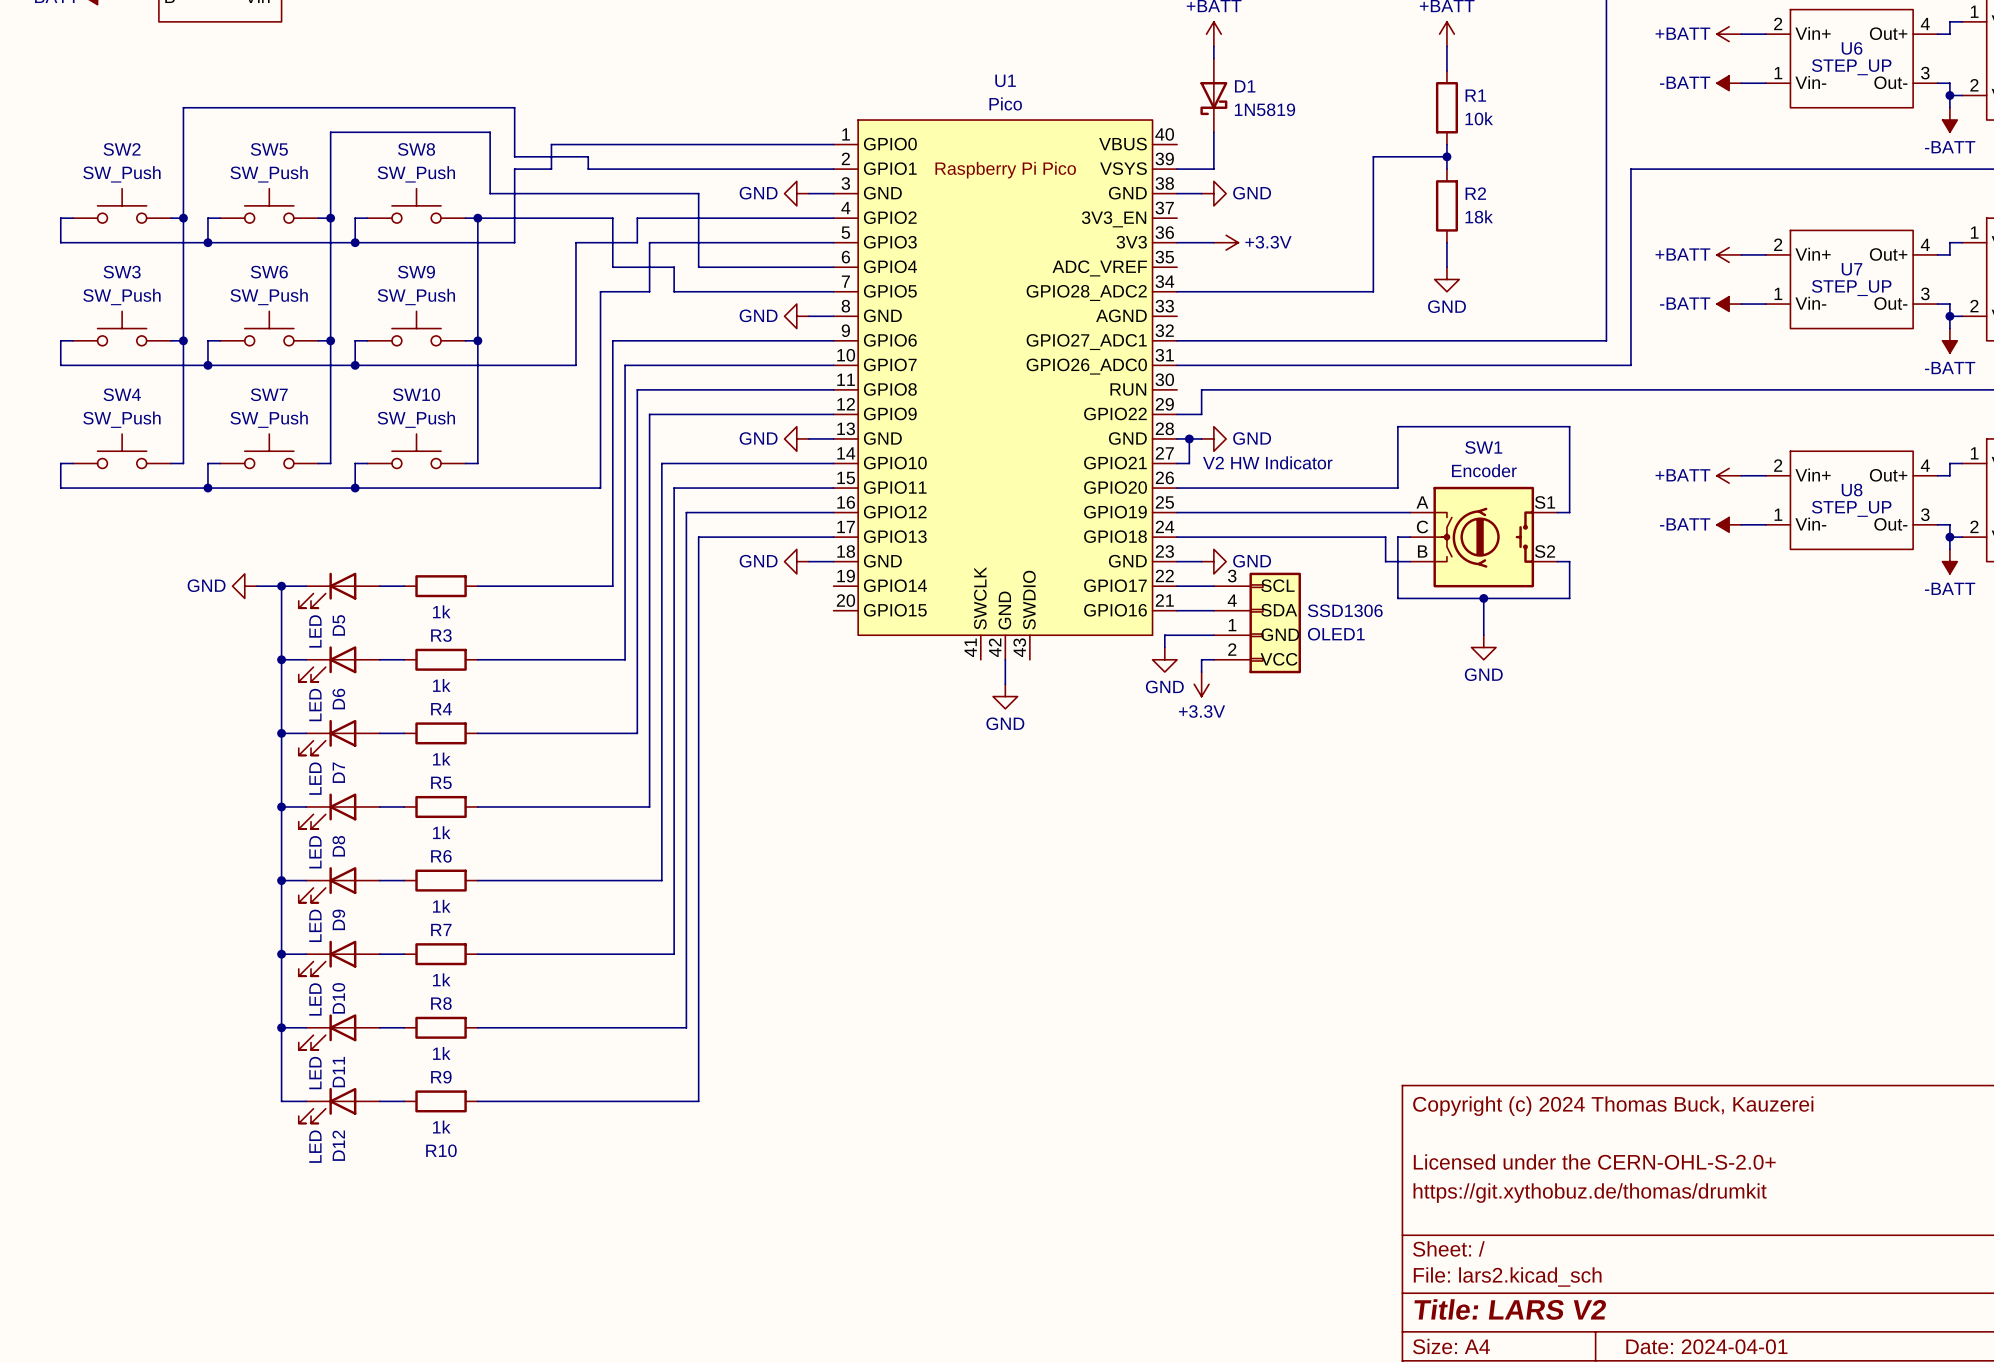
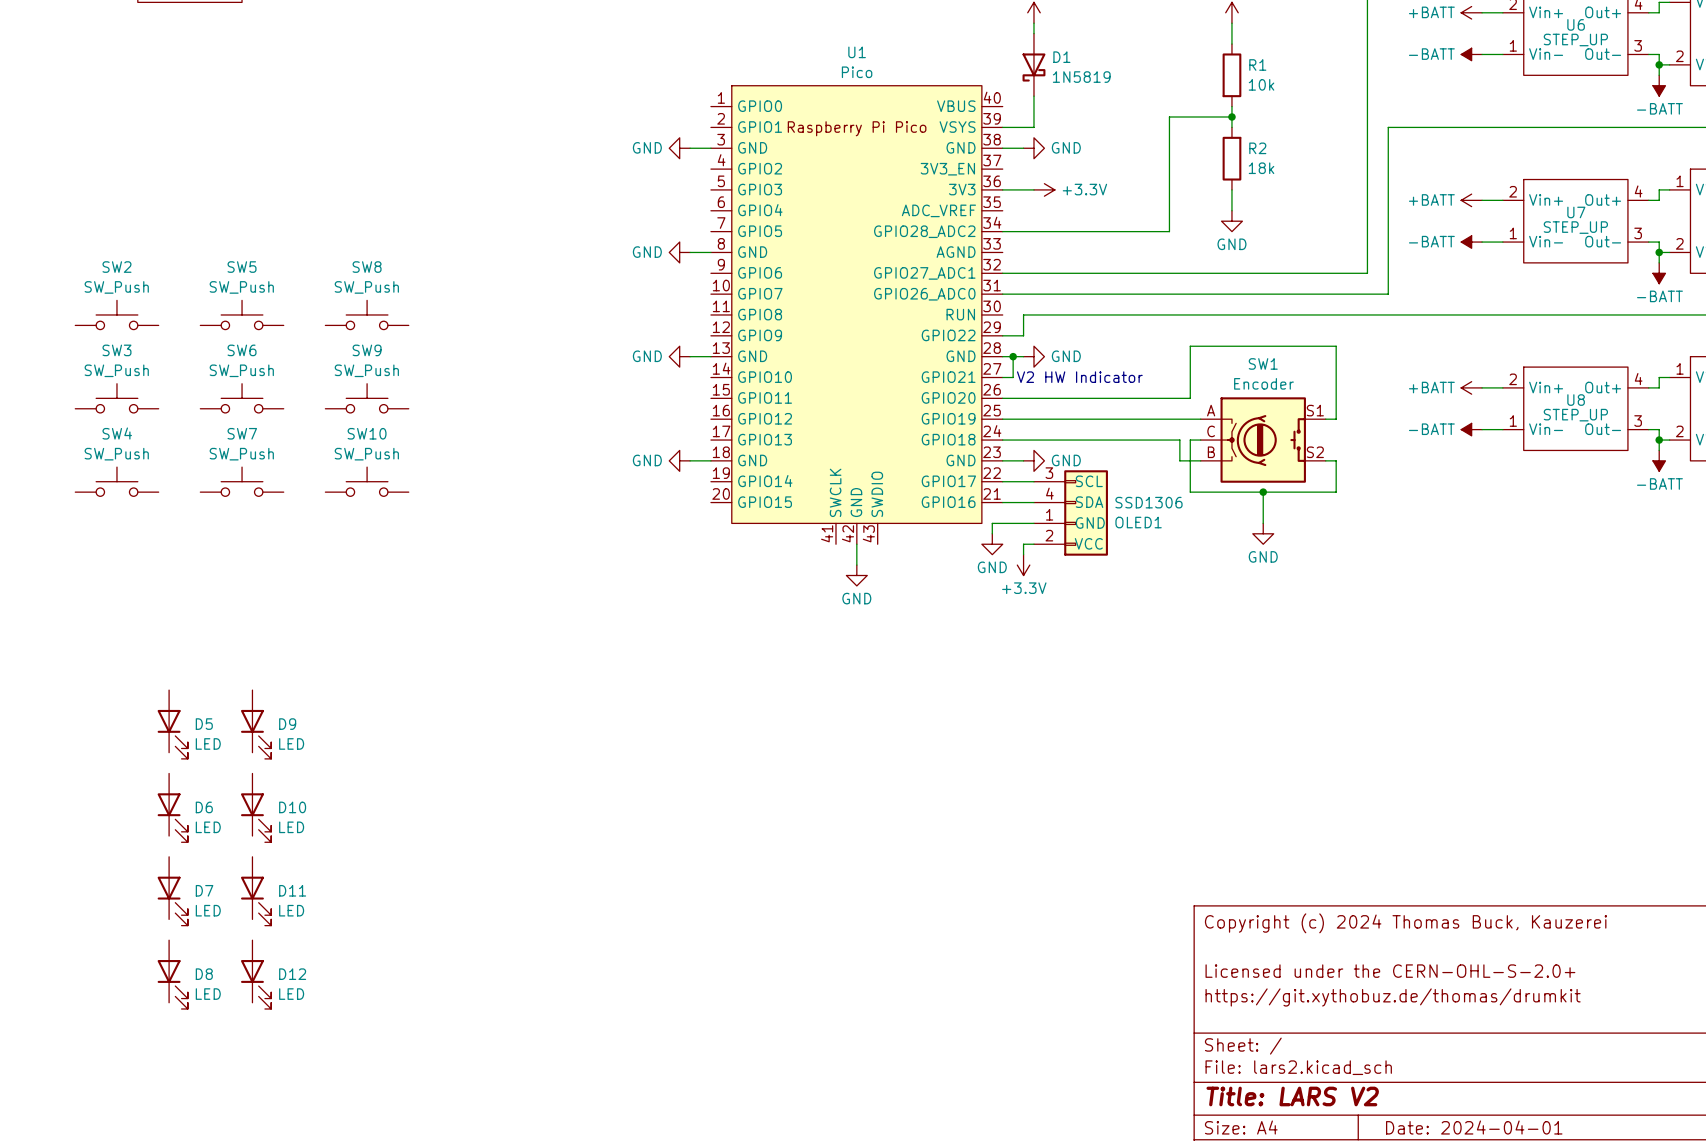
wire: (833, 144) (551, 144) (551, 169) (514, 169) (514, 242) (60, 242) (60, 218) (73, 218) -> none
wire: (833, 169) (588, 169) (588, 156) (514, 156) (514, 107) (183, 107) (183, 463) (171, 463) -> none
SW2 position: (122, 205) -> (116, 314)
SW5 position: (269, 205) -> (242, 314)
SW8 position: (416, 205) -> (367, 314)
wire: (171, 218) (183, 218) -> none
junction: (183, 218) -> none
wire: (220, 218) (207, 218) (207, 242) -> none
wire: (318, 218) (330, 218) -> none
junction: (330, 218) -> none
wire: (367, 218) (355, 218) (355, 242) -> none
wire: (465, 218) (612, 218) (612, 267) (674, 267) (674, 291) (833, 291) -> none
wire: (477, 218) (477, 463) (465, 463) -> none
junction: (477, 218) -> none
wire: (833, 218) (637, 218) (637, 242) (575, 242) (575, 365) (60, 365) (60, 340) (73, 340) -> none
junction: (207, 242) -> none
junction: (355, 242) -> none
wire: (833, 242) (649, 242) (649, 291) (600, 291) (600, 488) (60, 488) (60, 463) (73, 463) -> none
wire: (833, 267) (698, 267) (698, 193) (490, 193) (490, 132) (330, 132) (330, 463) (318, 463) -> none
SW3 position: (122, 328) -> (116, 398)
SW6 position: (269, 328) -> (242, 398)
SW9 position: (416, 328) -> (367, 398)
wire: (171, 340) (183, 340) -> none
junction: (183, 340) -> none
wire: (220, 340) (207, 340) (207, 365) -> none
wire: (318, 340) (330, 340) -> none
junction: (330, 340) -> none
wire: (367, 340) (355, 340) (355, 365) -> none
wire: (465, 340) (477, 340) -> none
junction: (477, 340) -> none
wire: (833, 340) (612, 340) (612, 586) (477, 586) -> none
junction: (207, 365) -> none
junction: (355, 365) -> none
wire: (833, 365) (625, 365) (625, 659) (477, 659) -> none
wire: (833, 389) (637, 389) (637, 733) (477, 733) -> none
wire: (833, 414) (649, 414) (649, 806) (477, 806) -> none
SW4 position: (122, 451) -> (116, 481)
SW7 position: (269, 451) -> (242, 481)
SW10 position: (416, 451) -> (367, 481)
wire: (220, 463) (207, 463) (207, 488) -> none
wire: (367, 463) (355, 463) (355, 488) -> none
wire: (833, 463) (661, 463) (661, 880) (477, 880) -> none
junction: (207, 488) -> none
junction: (355, 488) -> none
wire: (833, 488) (674, 488) (674, 954) (477, 954) -> none
wire: (833, 512) (686, 512) (686, 1027) (477, 1027) -> none
wire: (833, 537) (698, 537) (698, 1101) (477, 1101) -> none
power symbol: GND (244, 586) -> none
wire: (281, 586) (281, 1101) (306, 1101) -> none
junction: (281, 586) -> none
wire: (379, 586) (404, 586) -> none
R3: 1k (441, 586) -> none
D5 rotation: 0° (327, 590) -> 90° counterclockwise (172, 734)
D5 position: (339, 590) -> (172, 724)
wire: (281, 659) (306, 659) -> none
junction: (281, 659) -> none
wire: (379, 659) (404, 659) -> none
R4: 1k (441, 659) -> none
D6 rotation: 0° (327, 664) -> 90° counterclockwise (172, 817)
D6 position: (339, 664) -> (172, 807)
wire: (281, 733) (306, 733) -> none
junction: (281, 733) -> none
wire: (379, 733) (404, 733) -> none
R5: 1k (441, 733) -> none
D7 rotation: 0° (327, 737) -> 90° counterclockwise (172, 901)
D7 position: (339, 737) -> (172, 891)
wire: (281, 806) (306, 806) -> none
junction: (281, 806) -> none
wire: (379, 806) (404, 806) -> none
R6: 1k (441, 806) -> none
D8 rotation: 0° (327, 811) -> 90° counterclockwise (172, 984)
D8 position: (339, 811) -> (172, 974)
junction: (281, 880) -> none
wire: (379, 880) (404, 880) -> none
R7: 1k (441, 880) -> none
D9 rotation: 0° (327, 884) -> 90° counterclockwise (256, 734)
junction: (281, 954) -> none
wire: (379, 954) (404, 954) -> none
R8: 1k (441, 954) -> none
D10 rotation: 0° (327, 958) -> 90° counterclockwise (256, 817)
wire: (281, 1027) (306, 1027) -> none
junction: (281, 1027) -> none
wire: (379, 1027) (404, 1027) -> none
R9: 1k (441, 1027) -> none
D11 rotation: 0° (327, 1032) -> 90° counterclockwise (256, 901)
D11 position: (339, 1032) -> (256, 891)
wire: (379, 1101) (404, 1101) -> none
R10: 1k (441, 1101) -> none
D12 rotation: 0° (327, 1105) -> 90° counterclockwise (256, 984)
D12 position: (339, 1105) -> (256, 974)

